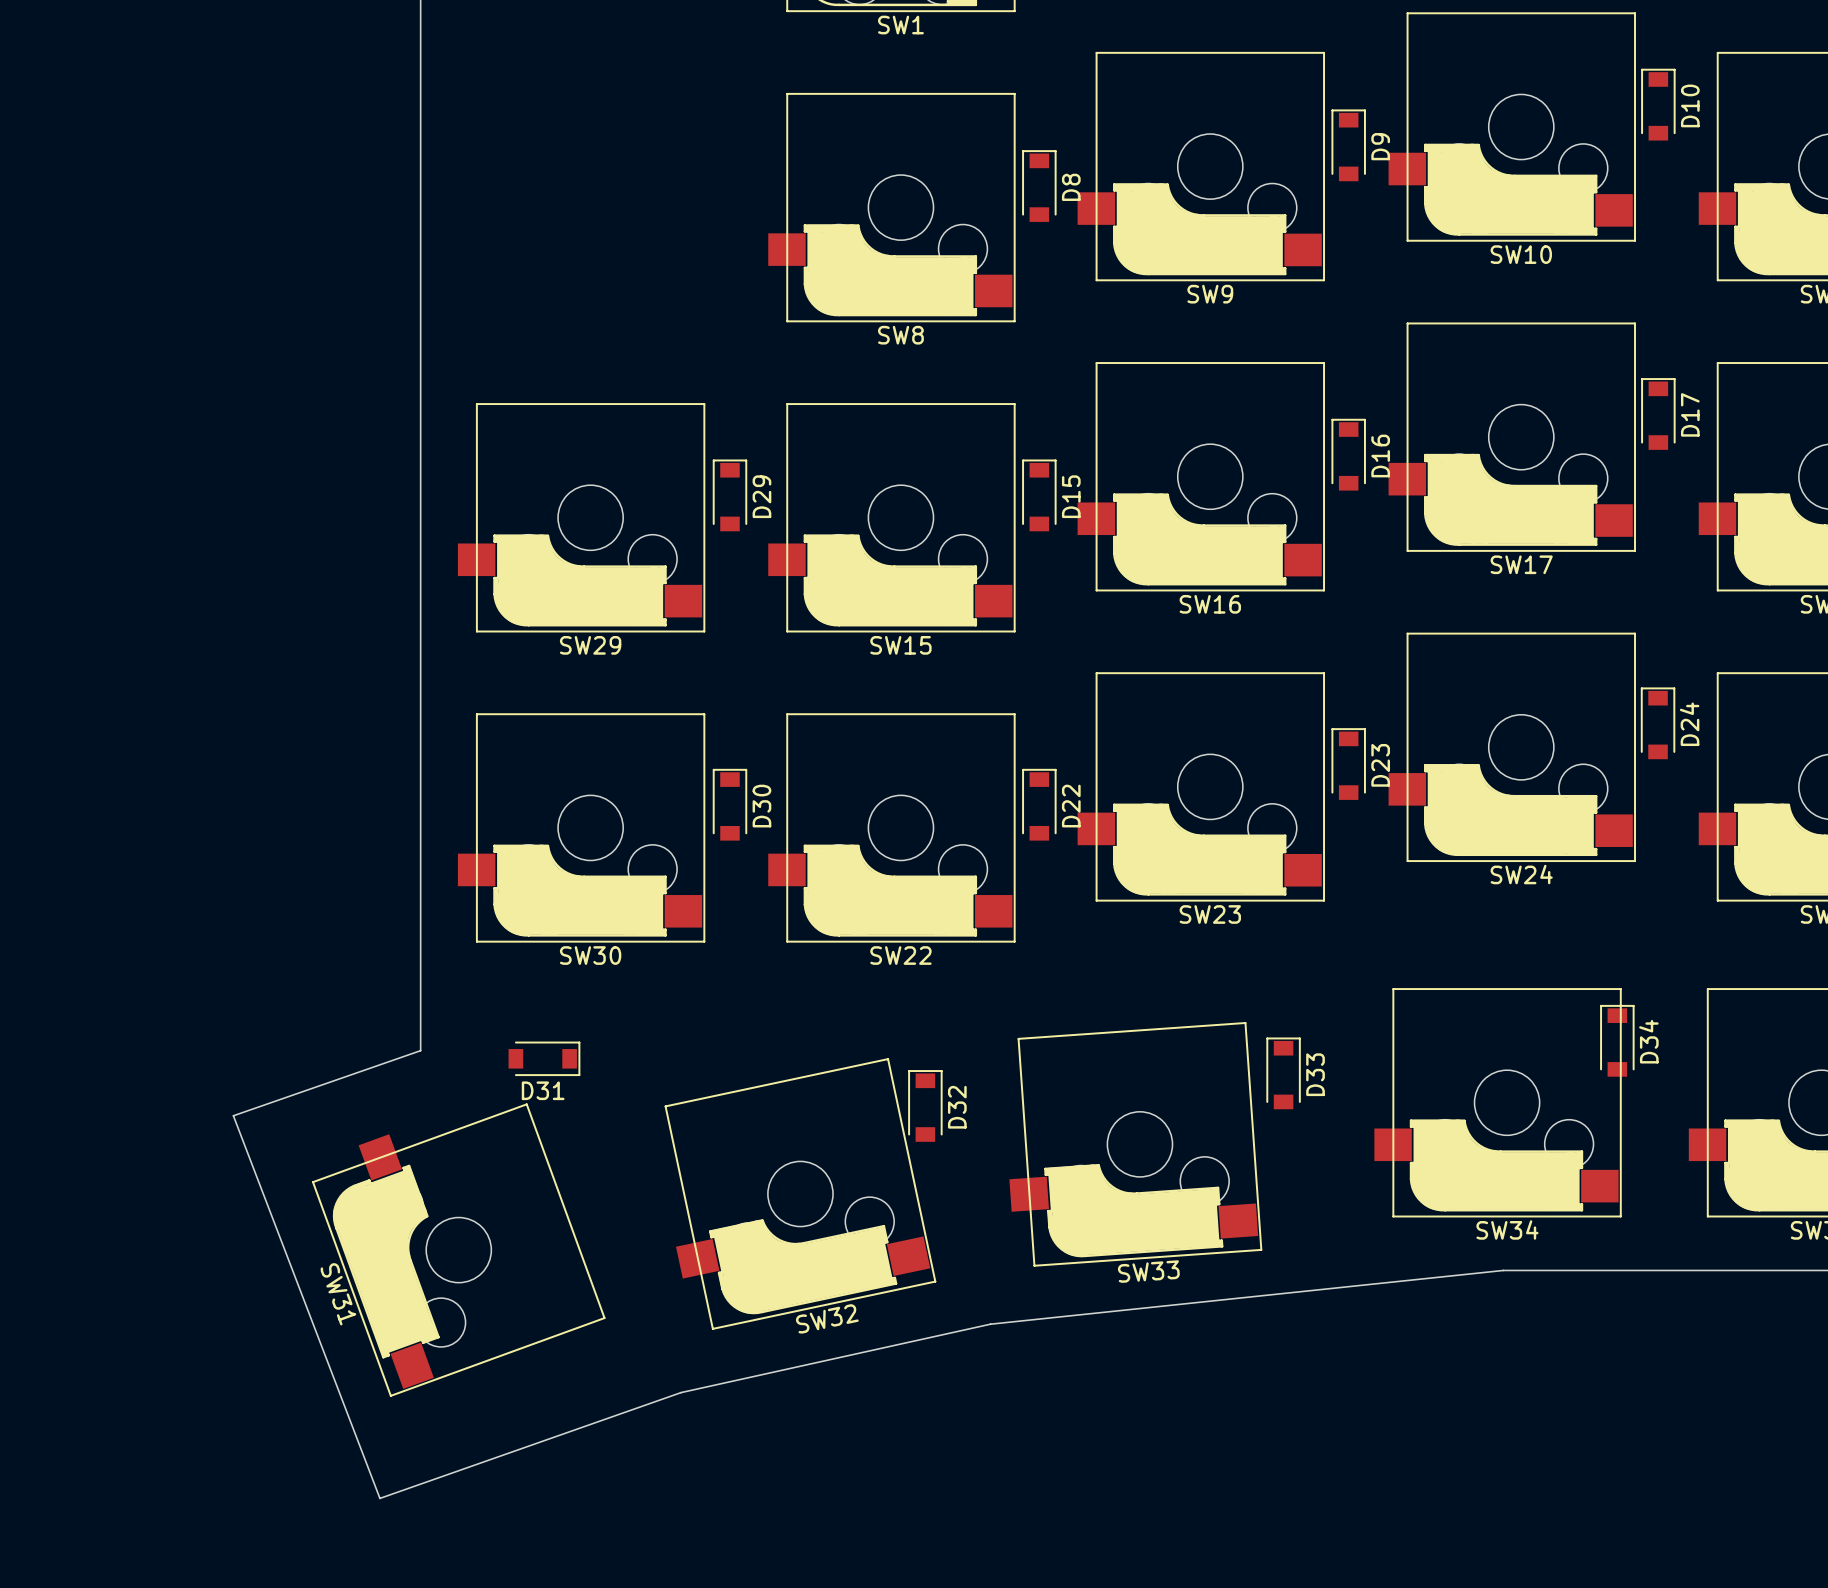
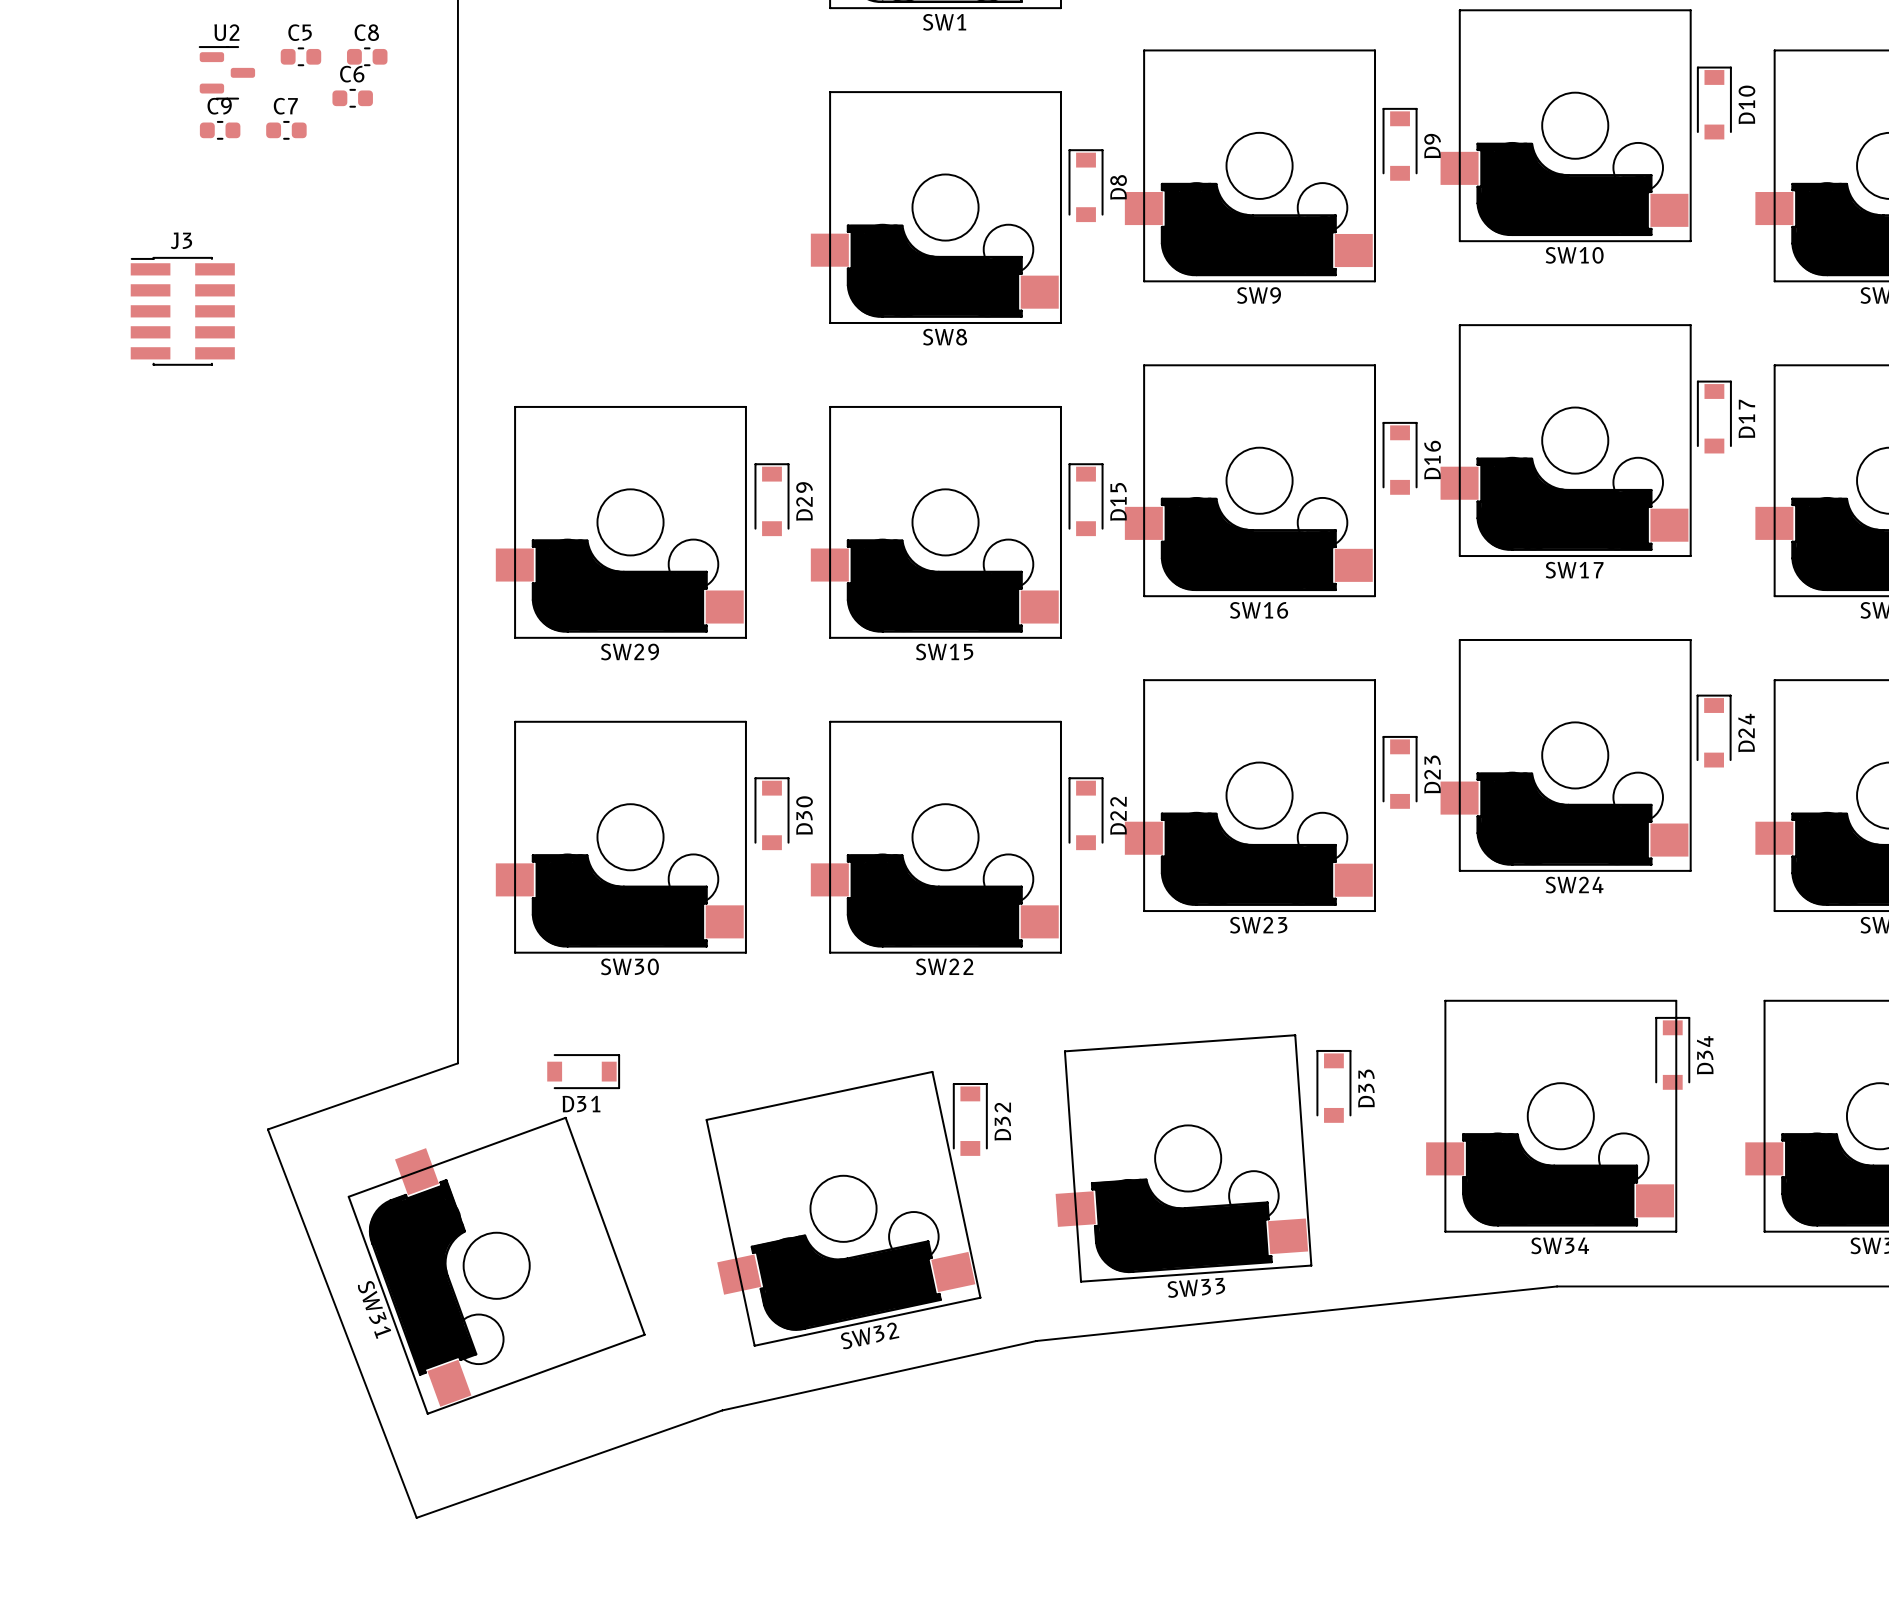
C5: none -> (300, 56)
C8: none -> (367, 56)
U2: none -> (226, 72)
C6: none -> (352, 98)
C9: none -> (220, 130)
C7: none -> (286, 130)
J3: none -> (182, 311)

